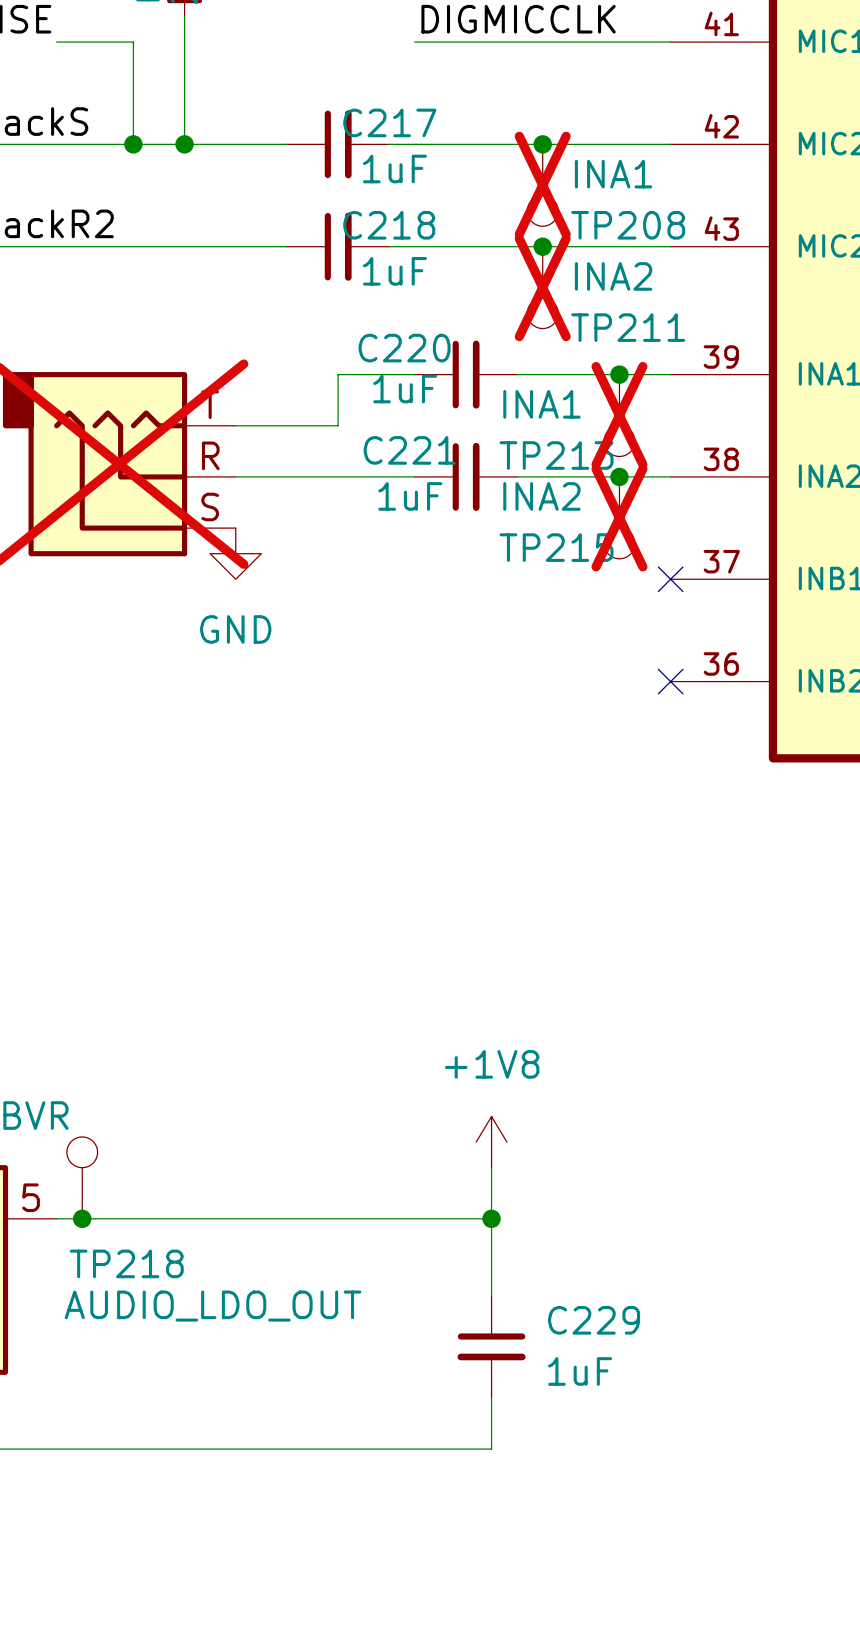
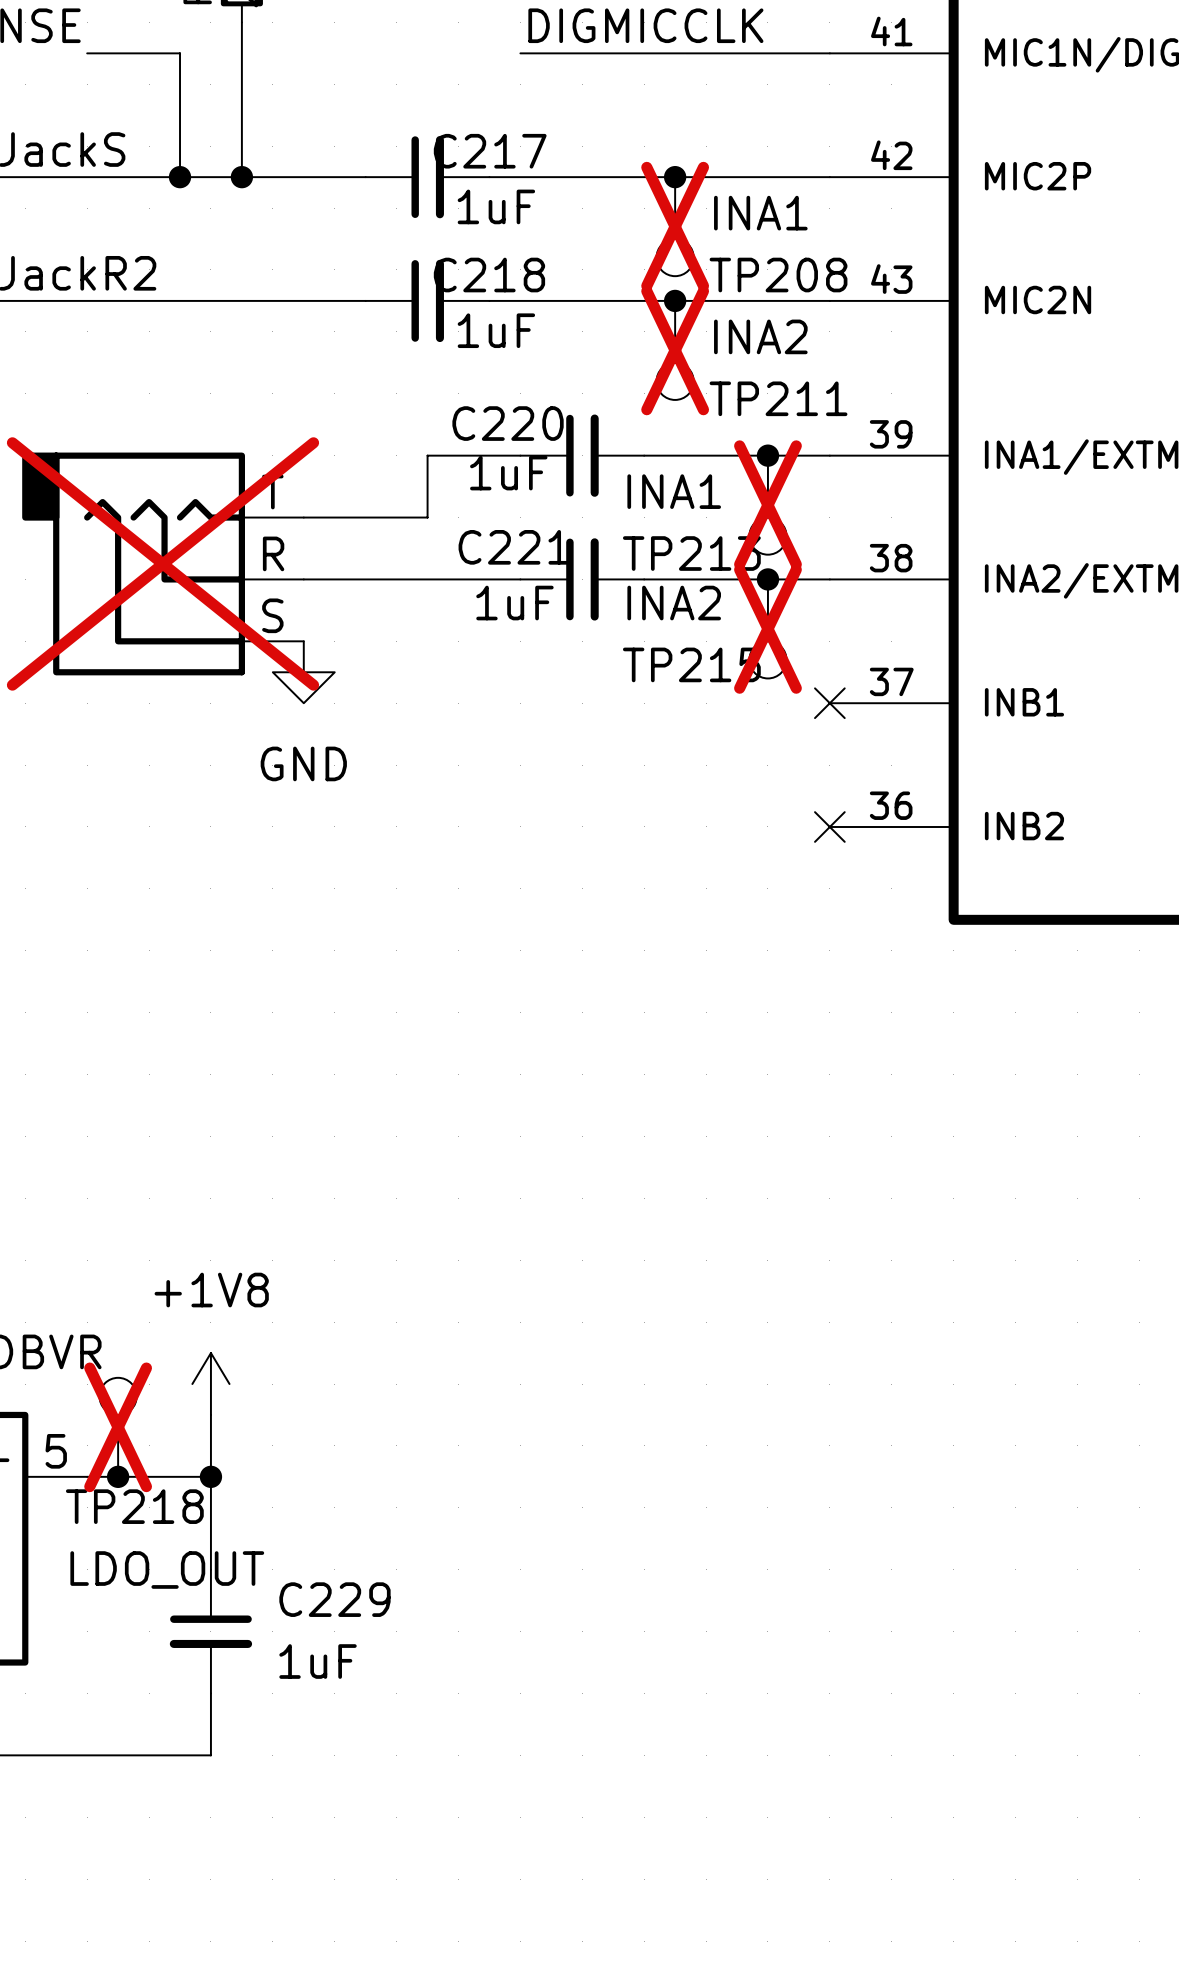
power symbol position: +1V8 (491, 1142) -> +1V8 (210, 1384)
wire: (491, 1167) (491, 1295) -> (210, 1414) (210, 1569)
TP218 do-not-place cross: none -> (118, 1427)
wire: (158, 1218) (491, 1218) -> none
junction: none -> (210, 1476)
junction: (491, 1218) -> none
TP218 name position: TP218 (126, 1263) -> TP218 (134, 1506)
TP218 value: AUDIO_LDO_OUT (213, 1306) -> LDO_OUT (167, 1570)
C229 position: (491, 1346) -> (210, 1631)
wire: (491, 1397) (491, 1449) (158, 1449) -> (210, 1693) (210, 1755)

